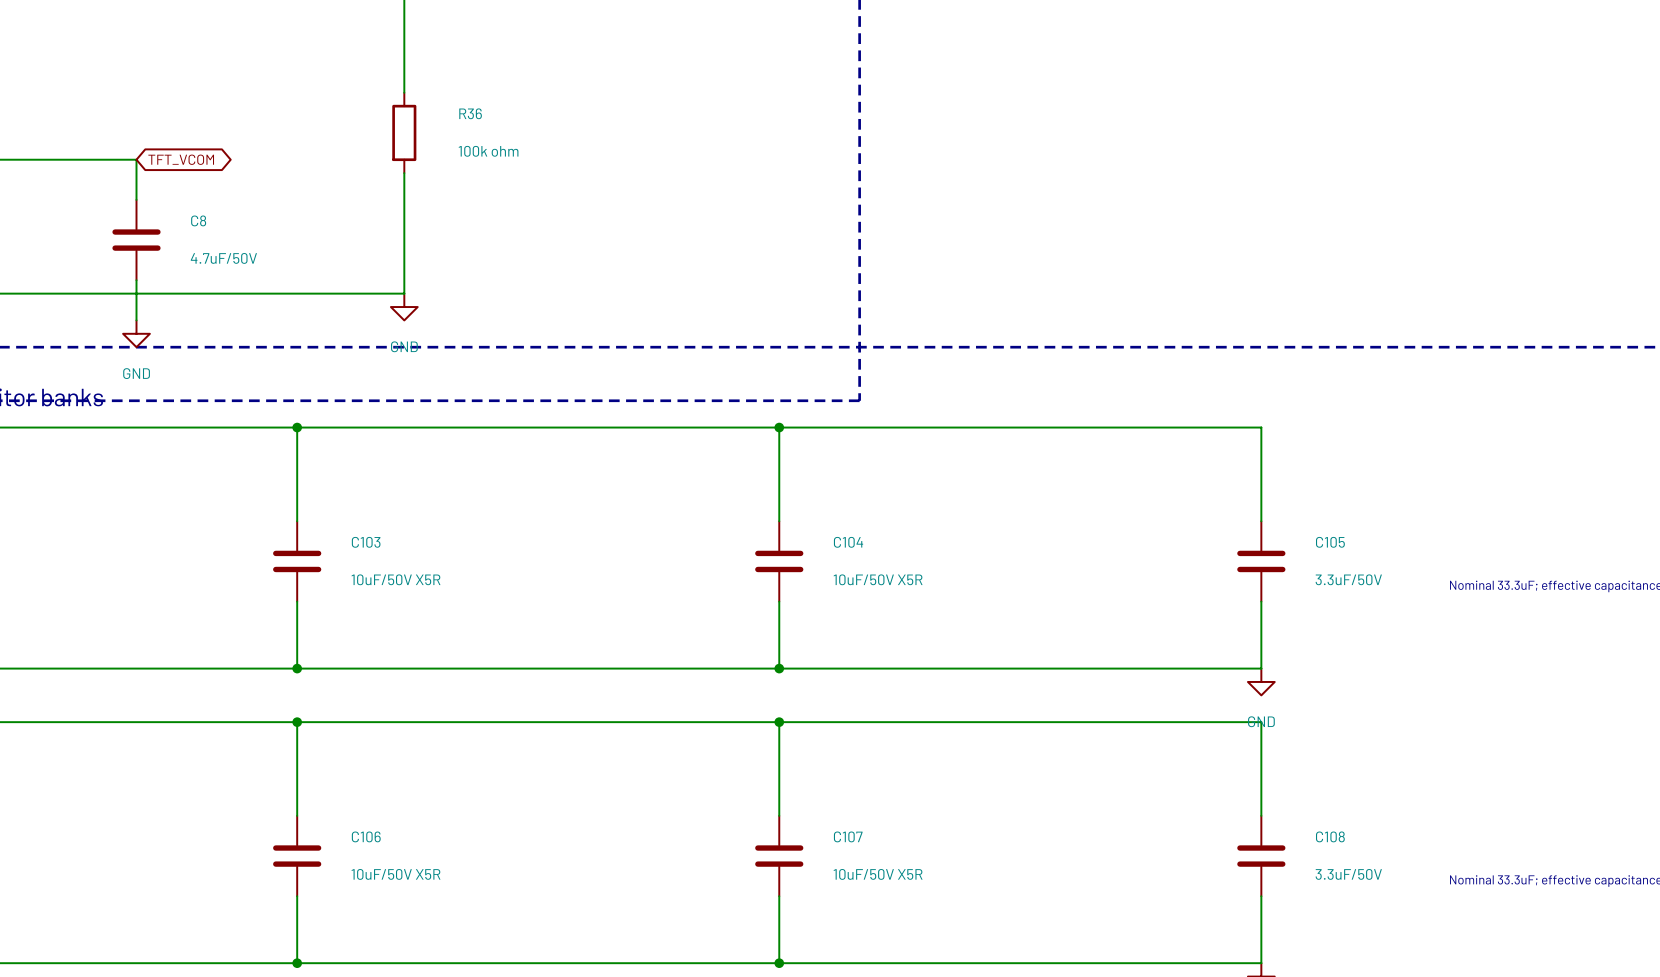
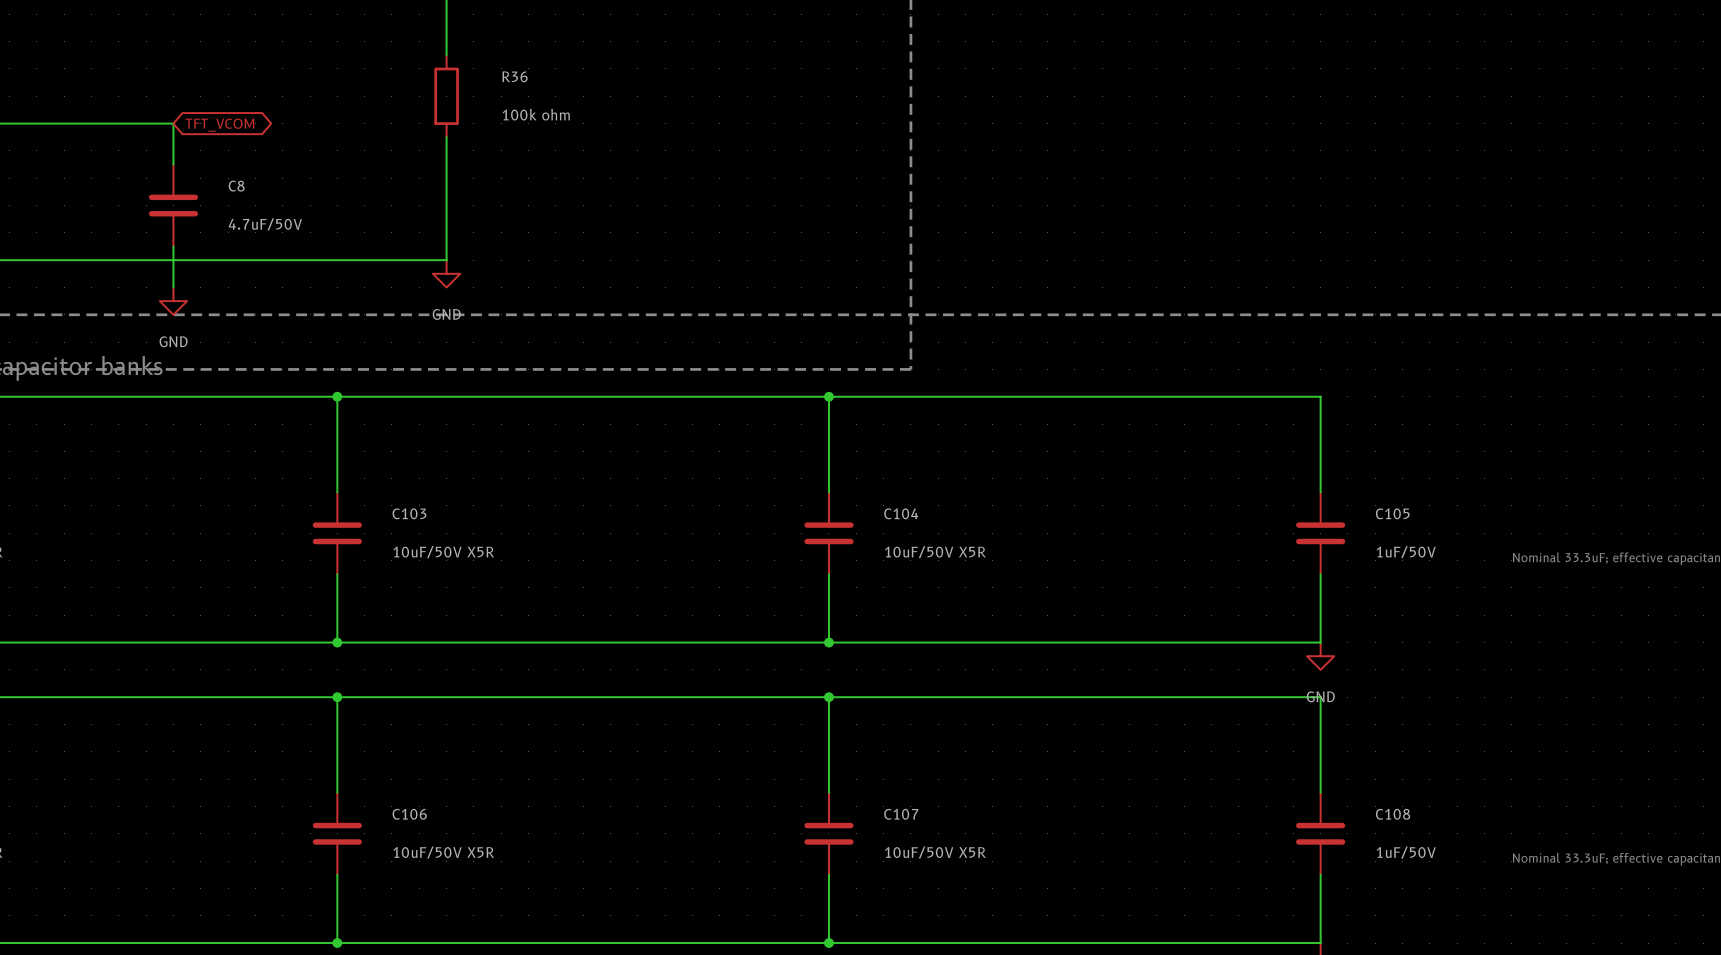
C105 value: 3.3uF/50V (1348, 579) -> 1uF/50V (1406, 552)
C108 value: 3.3uF/50V (1348, 874) -> 1uF/50V (1406, 852)

